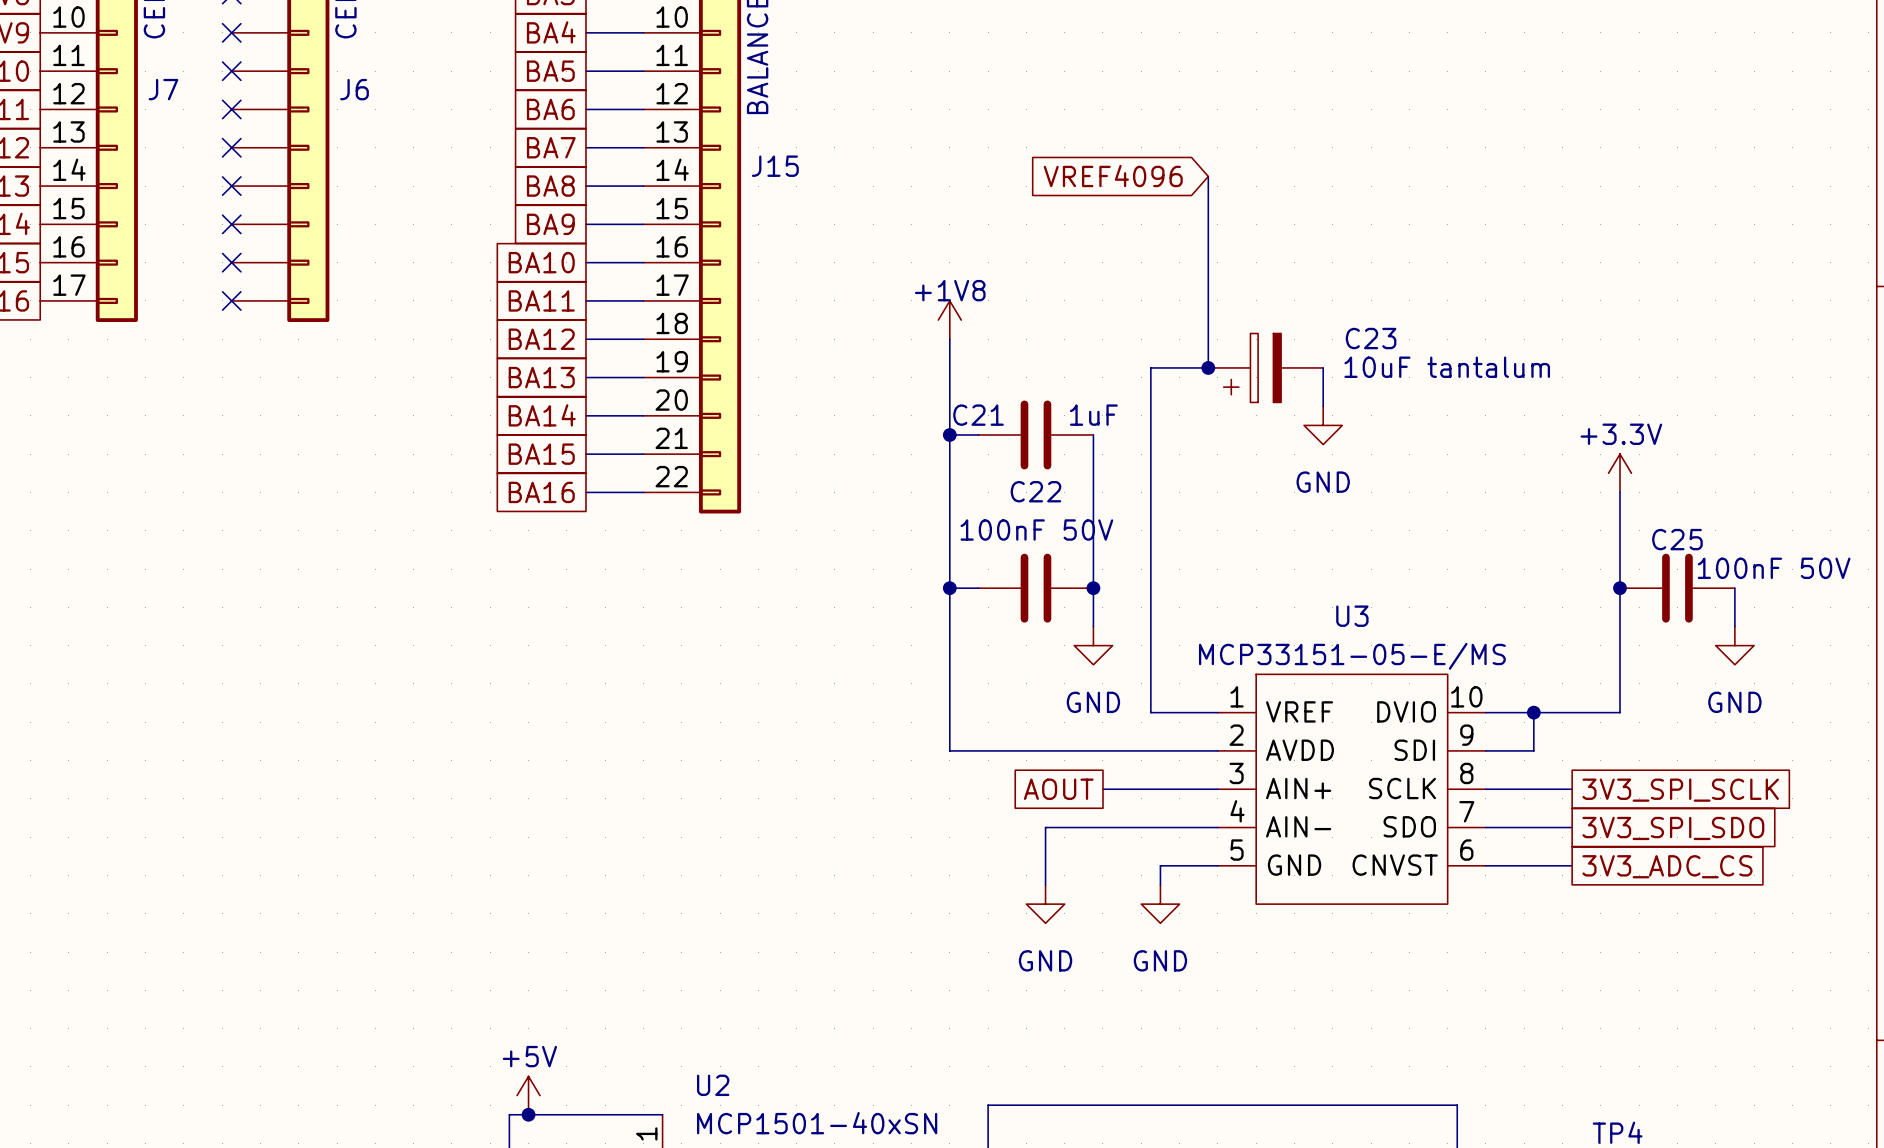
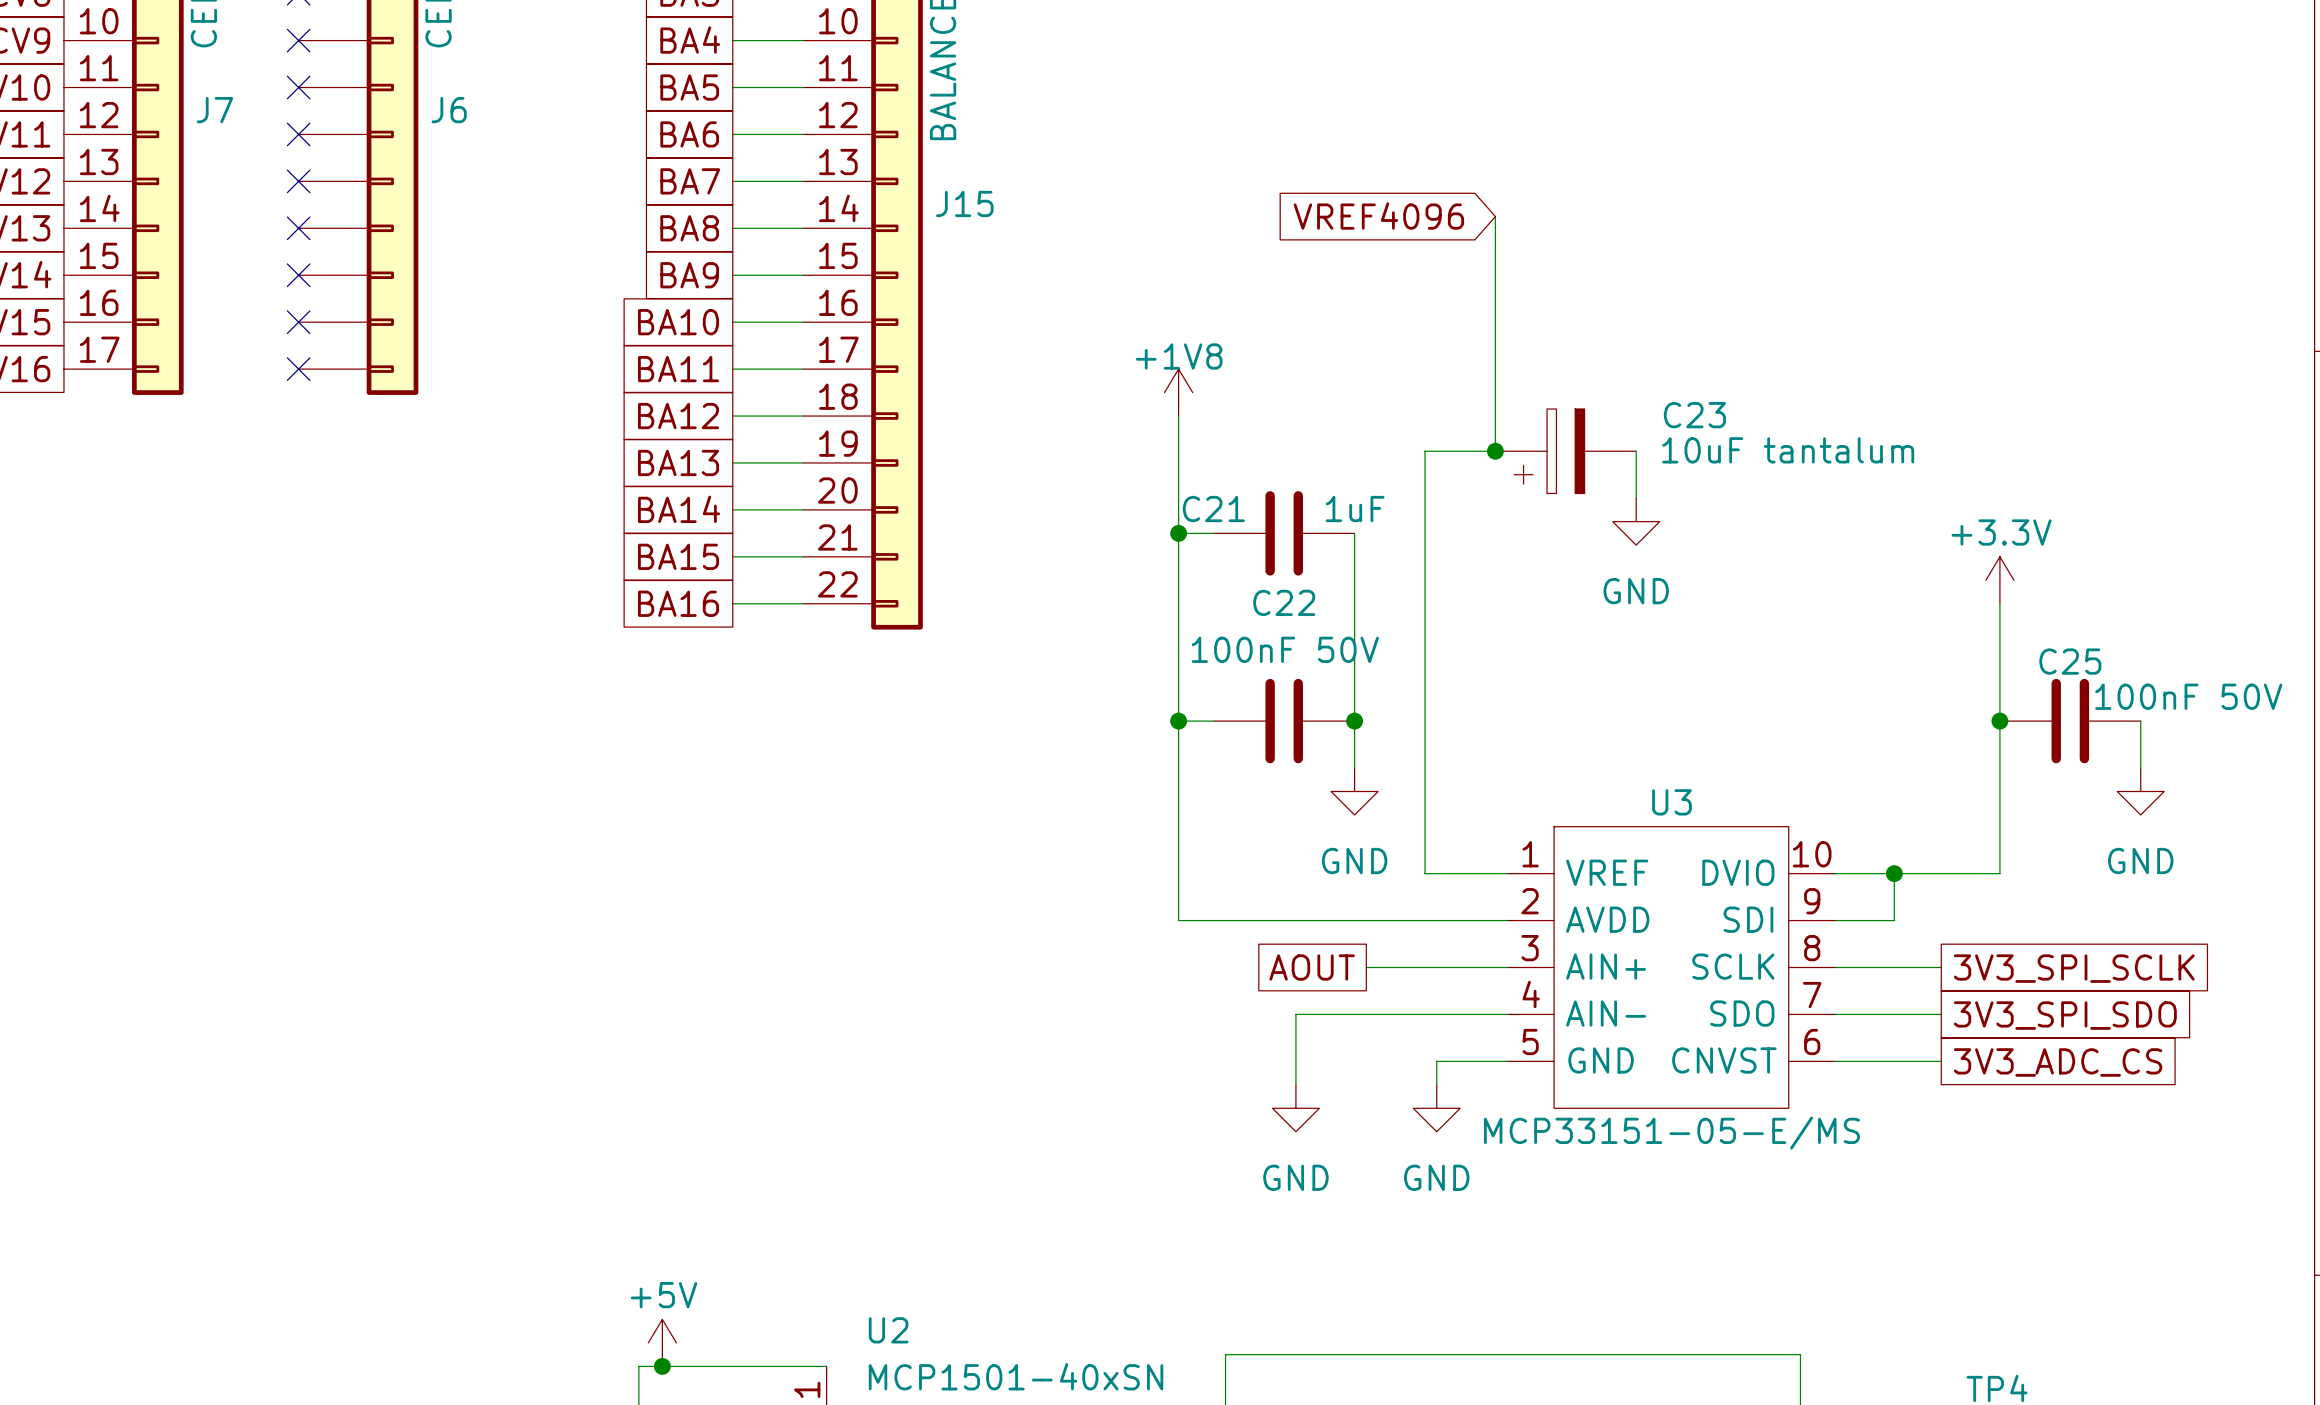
U3 name position: U3 (1352, 616) -> U3 (1671, 802)
U3 value position: MCP33151-05-E/MS (1352, 656) -> MCP33151-05-E/MS (1671, 1133)

